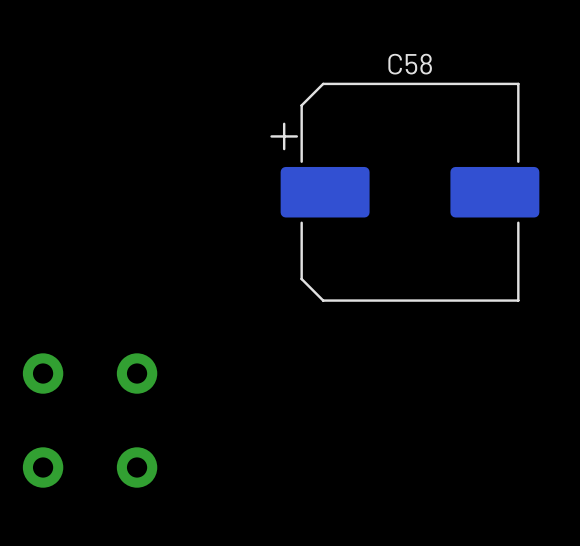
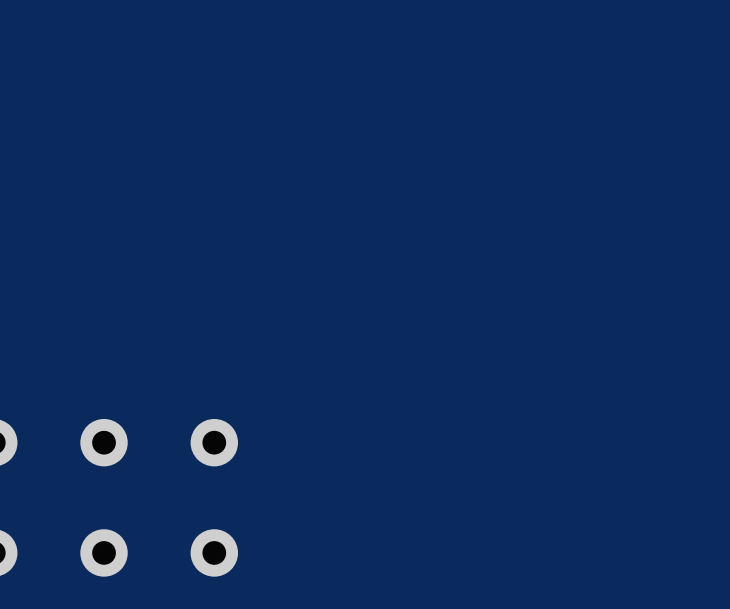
C58: (404, 192) -> none

